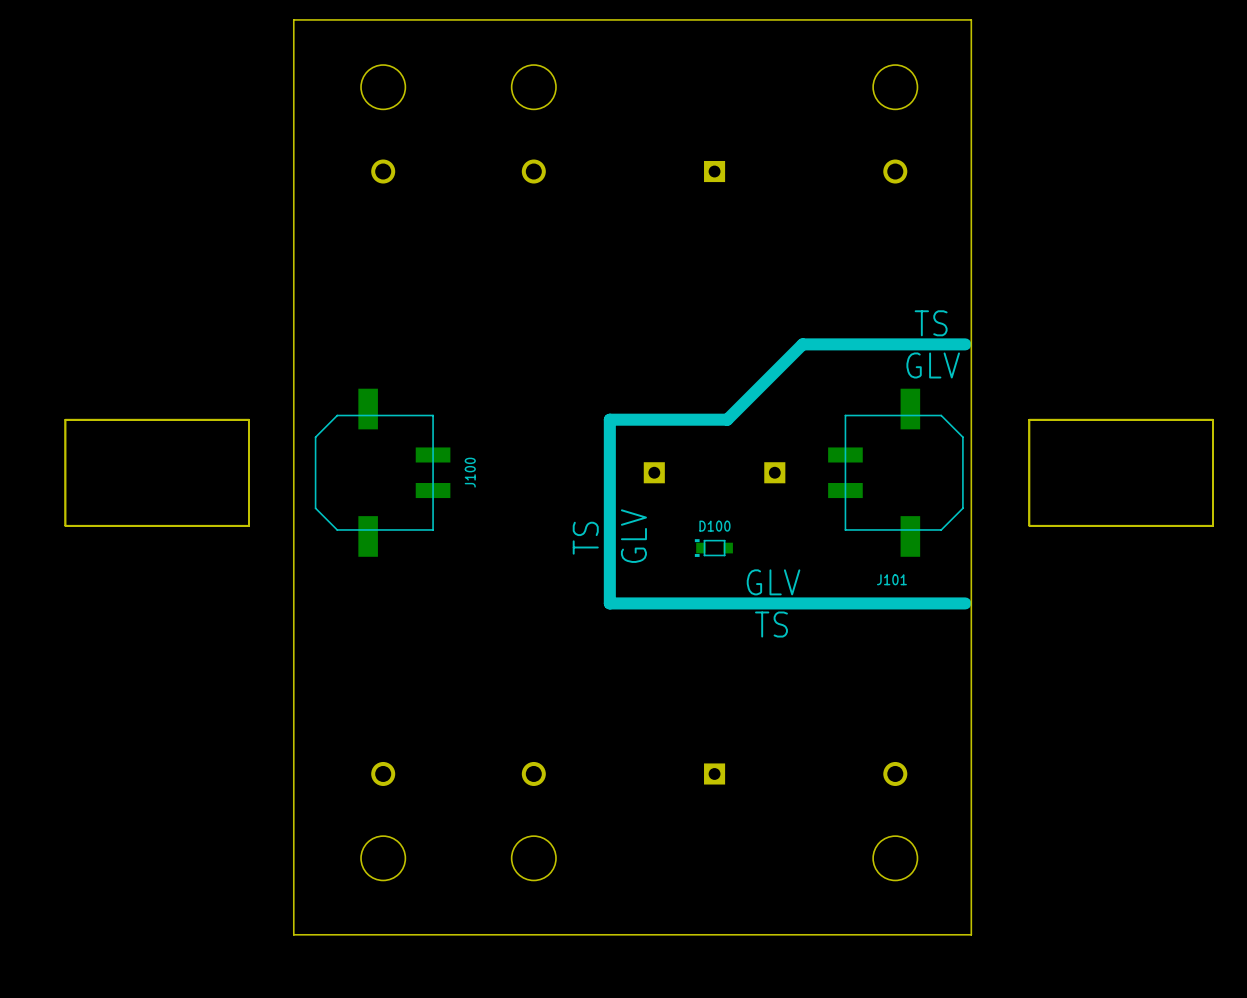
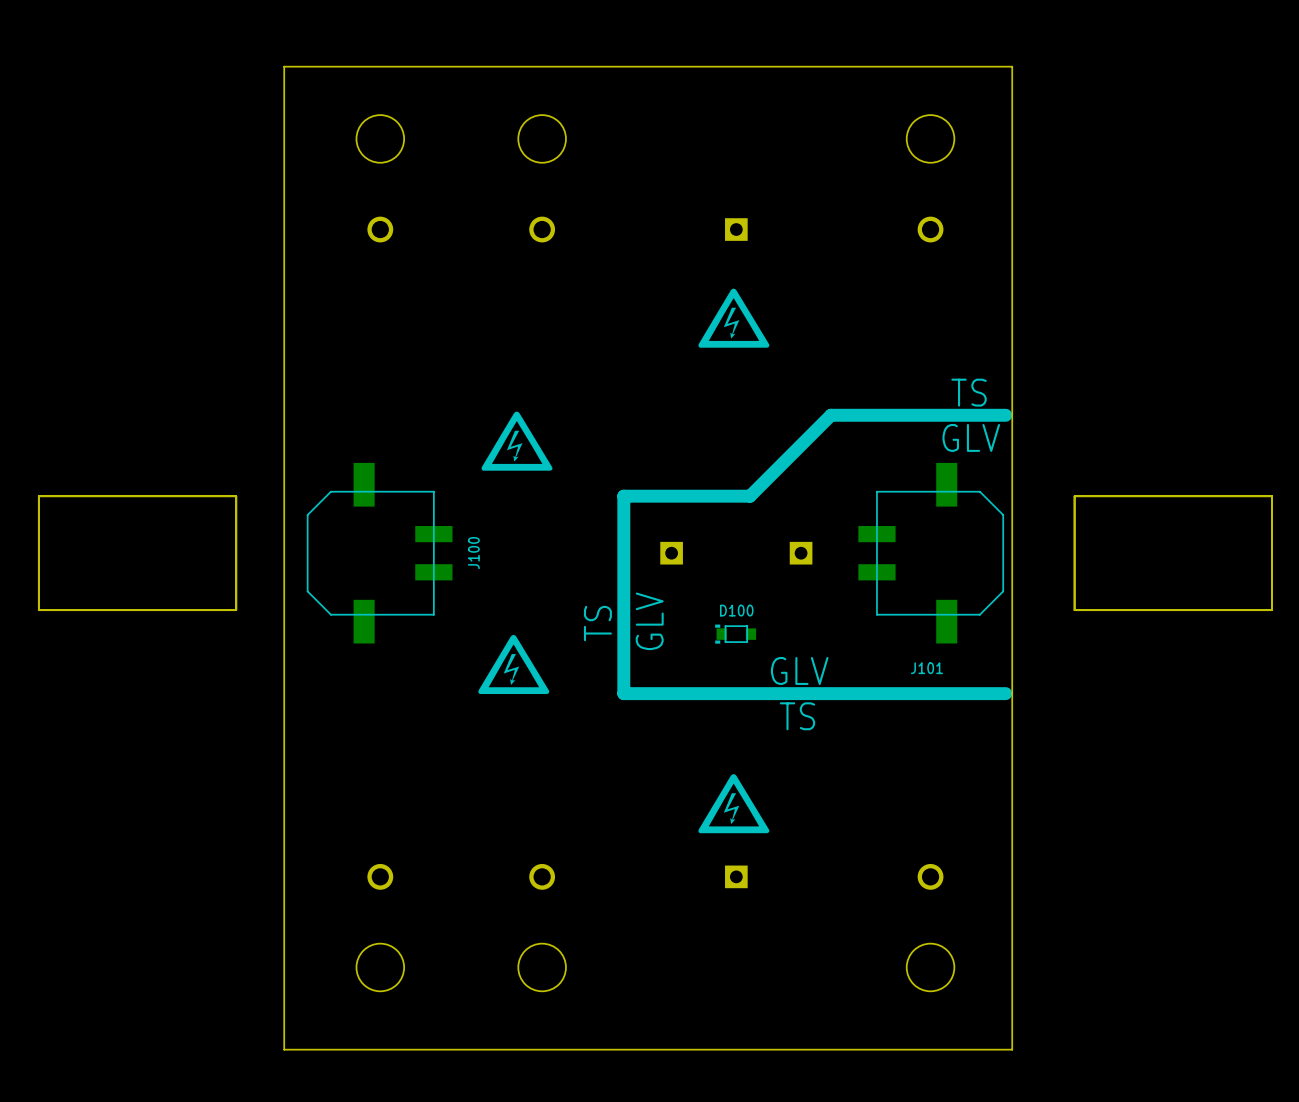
drawing: none -> [698, 288, 770, 348]
drawing: none -> [481, 411, 553, 471]
drawing: none -> [478, 634, 550, 695]
drawing: none -> [698, 774, 770, 834]

